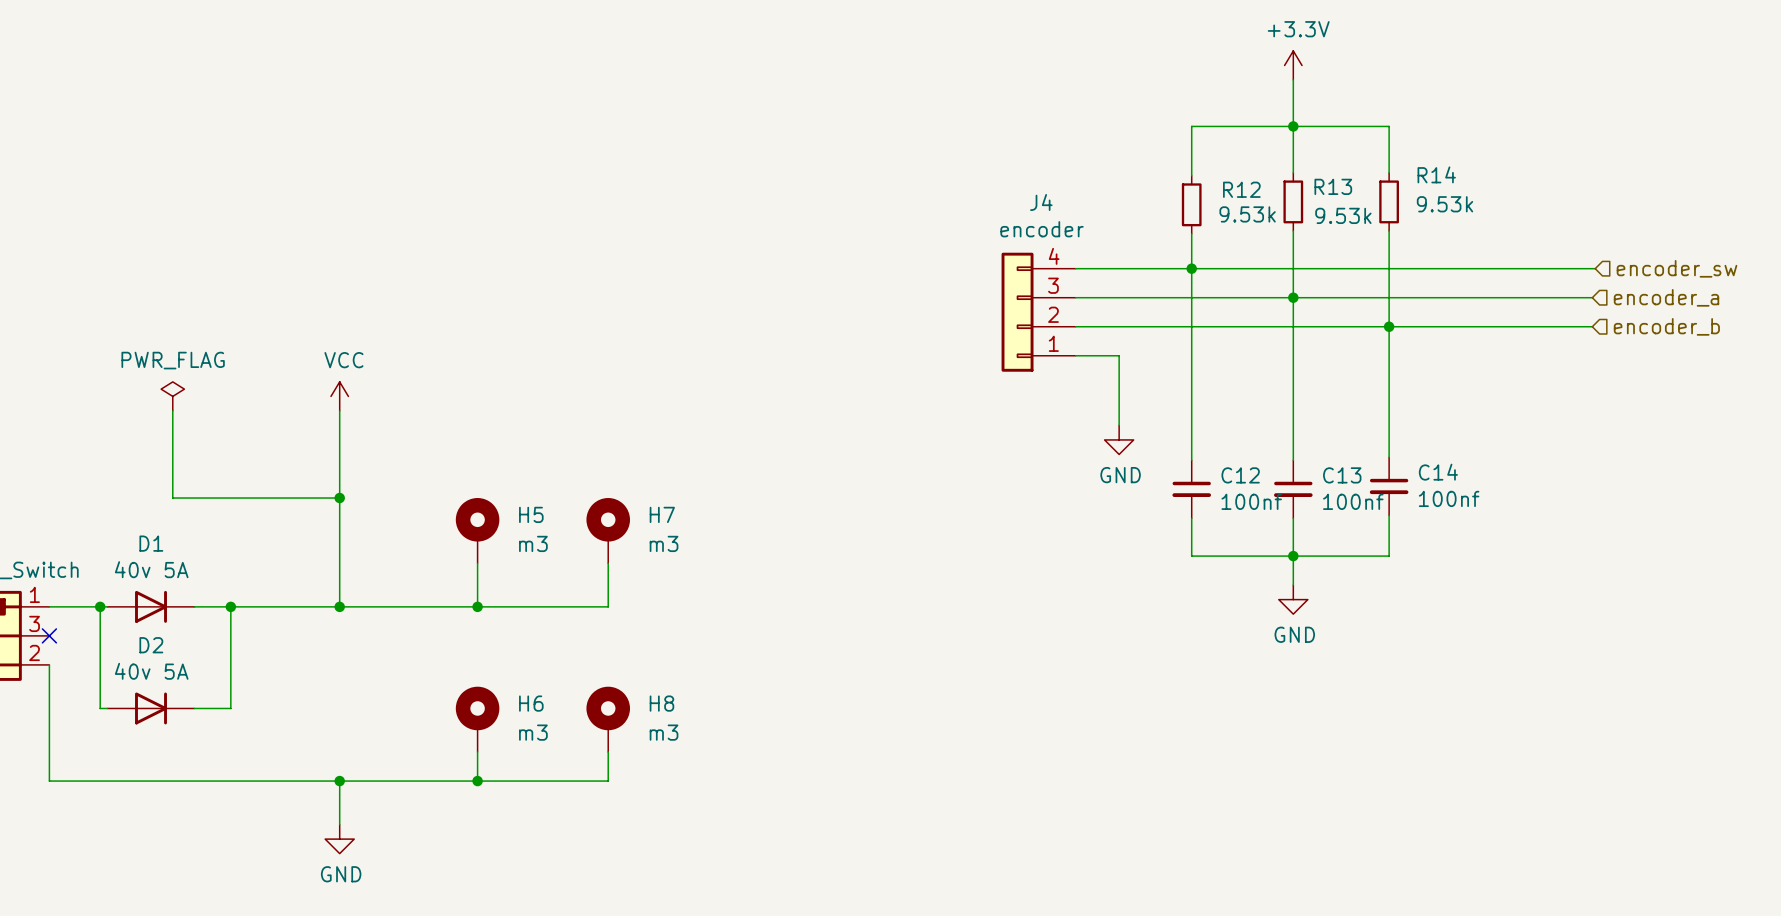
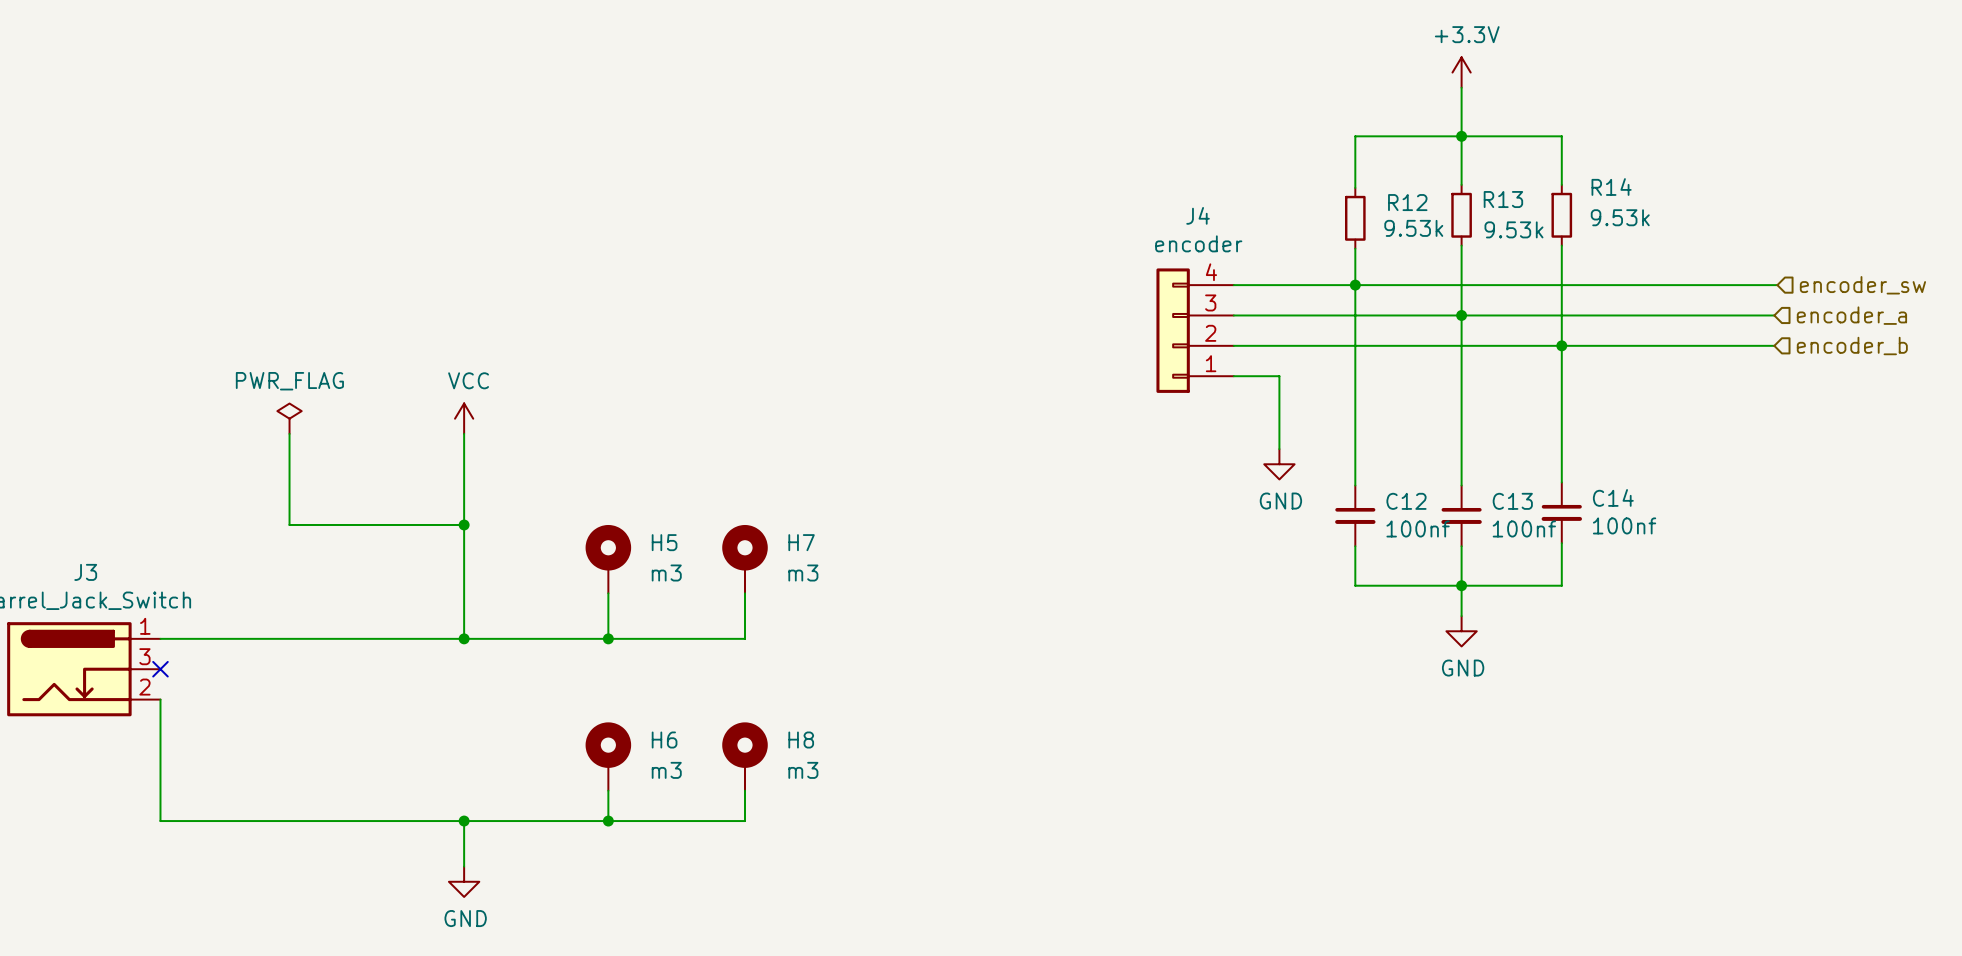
wire: (100, 606) (100, 708) (107, 708) -> none
junction: (100, 606) -> none
D1: 40v 5A (151, 606) -> none
wire: (230, 606) (230, 708) (194, 708) -> none
junction: (230, 606) -> none
D2: 40v 5A (151, 708) -> none

